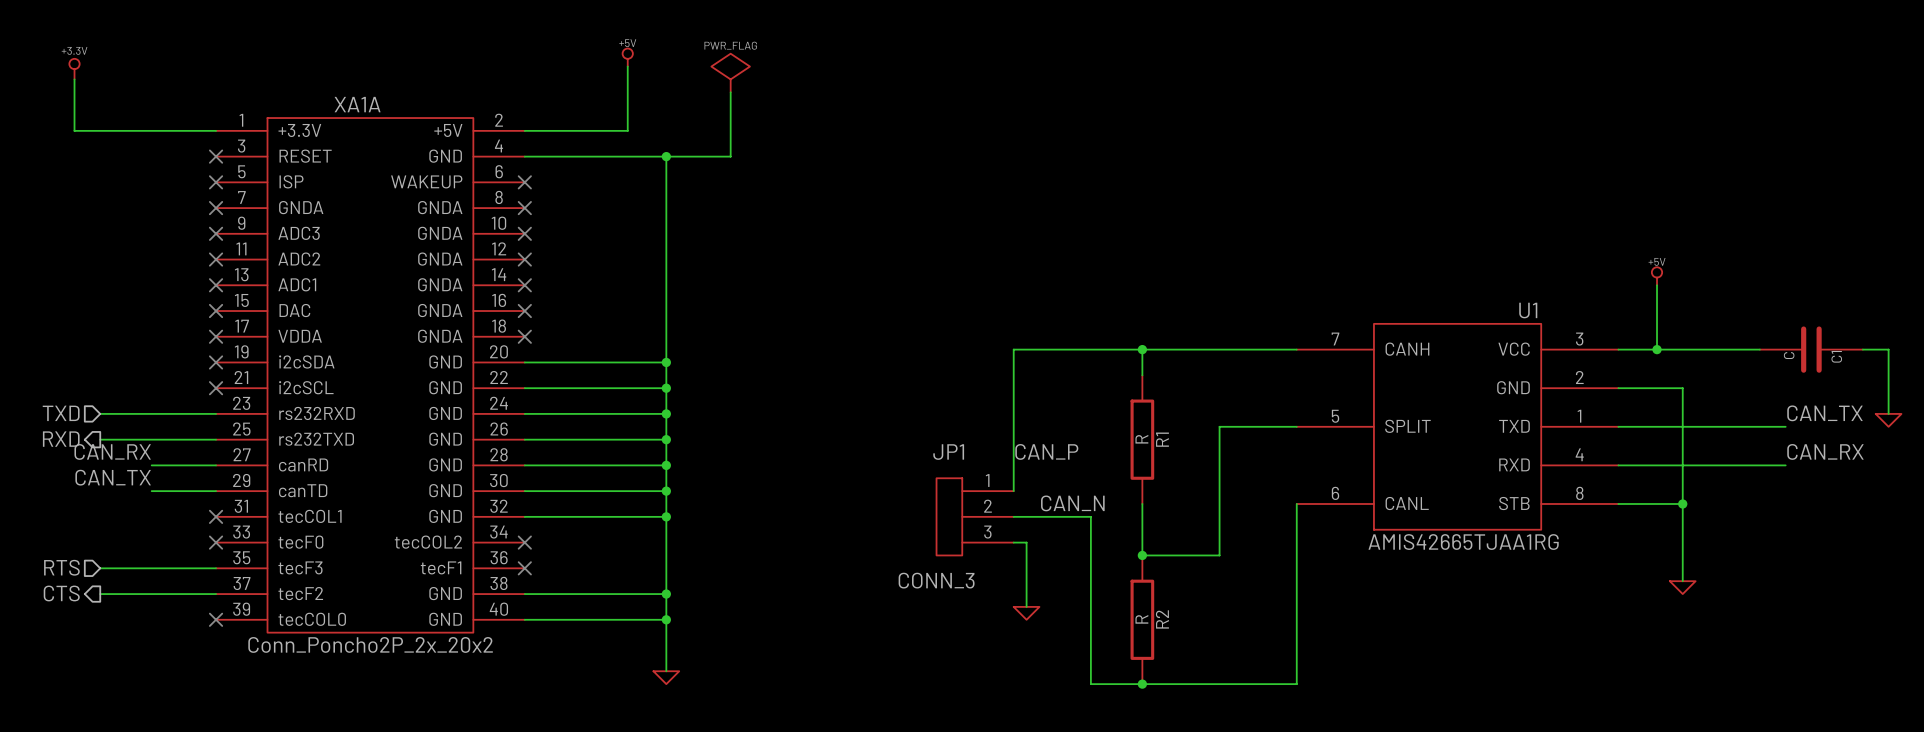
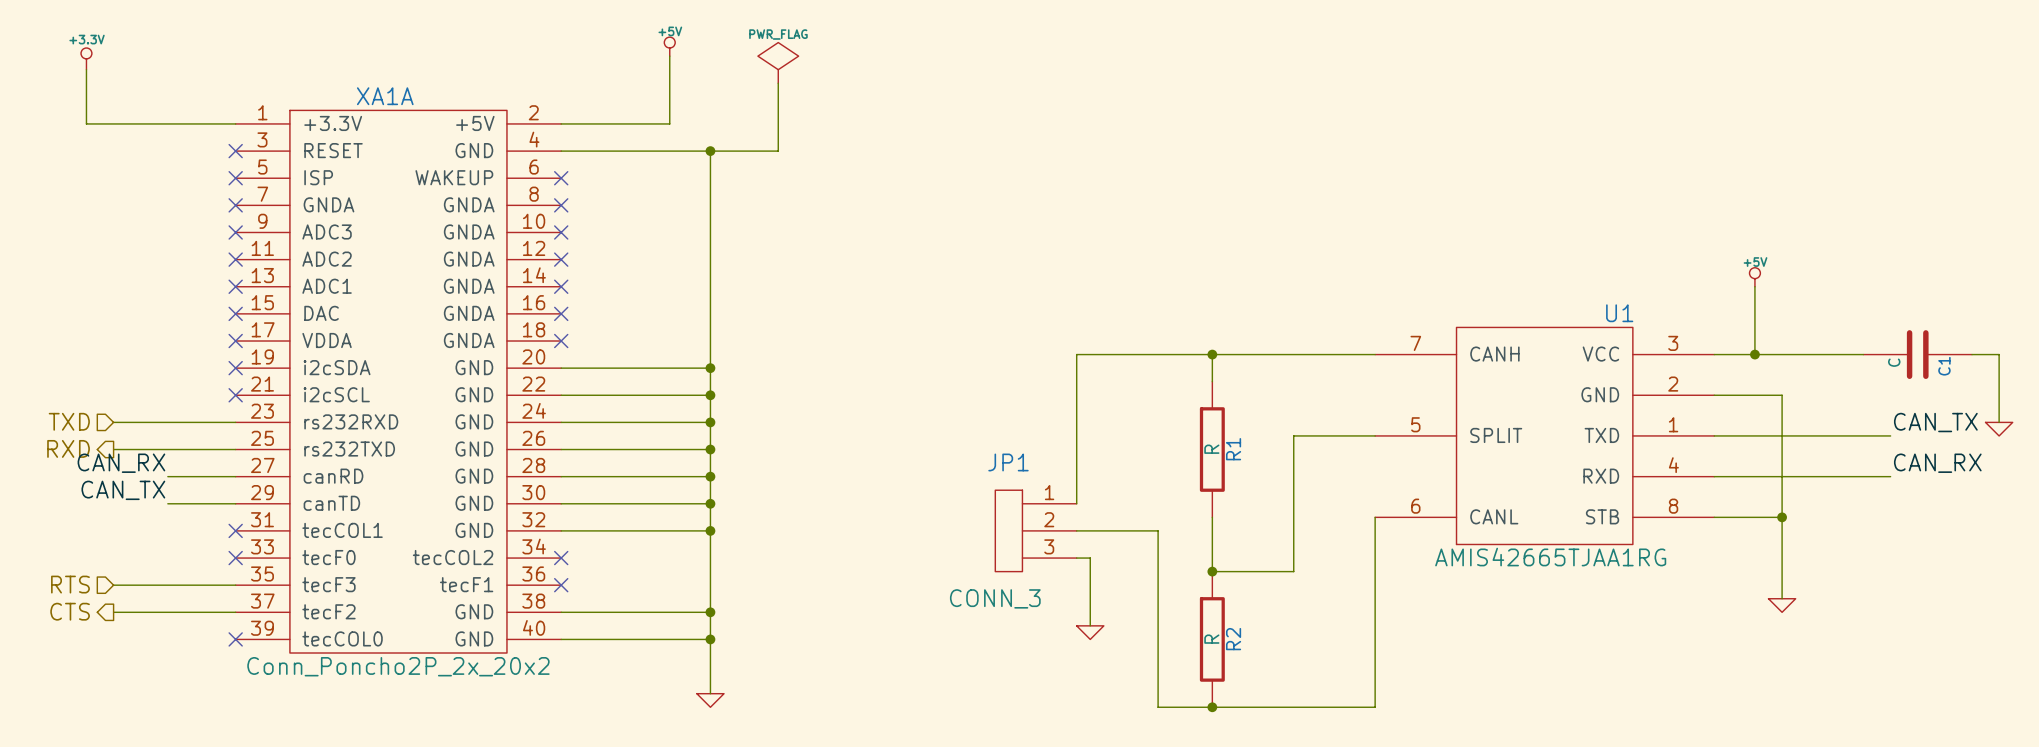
label: CAN_P (1046, 451) -> none
label: CAN_N (1072, 503) -> none

